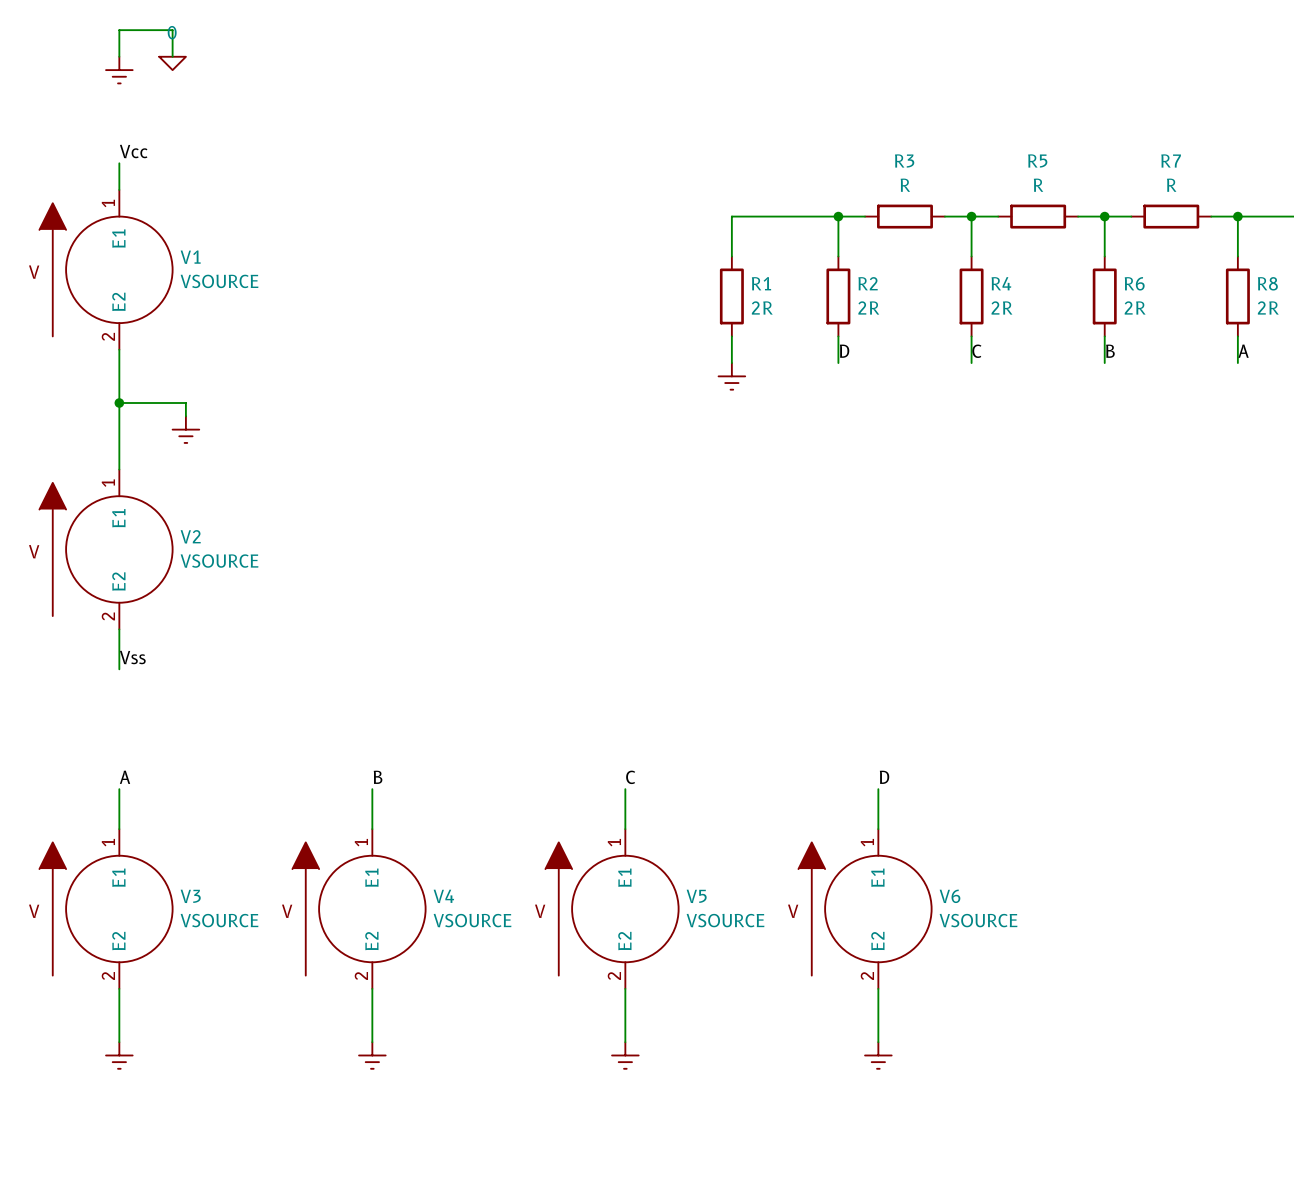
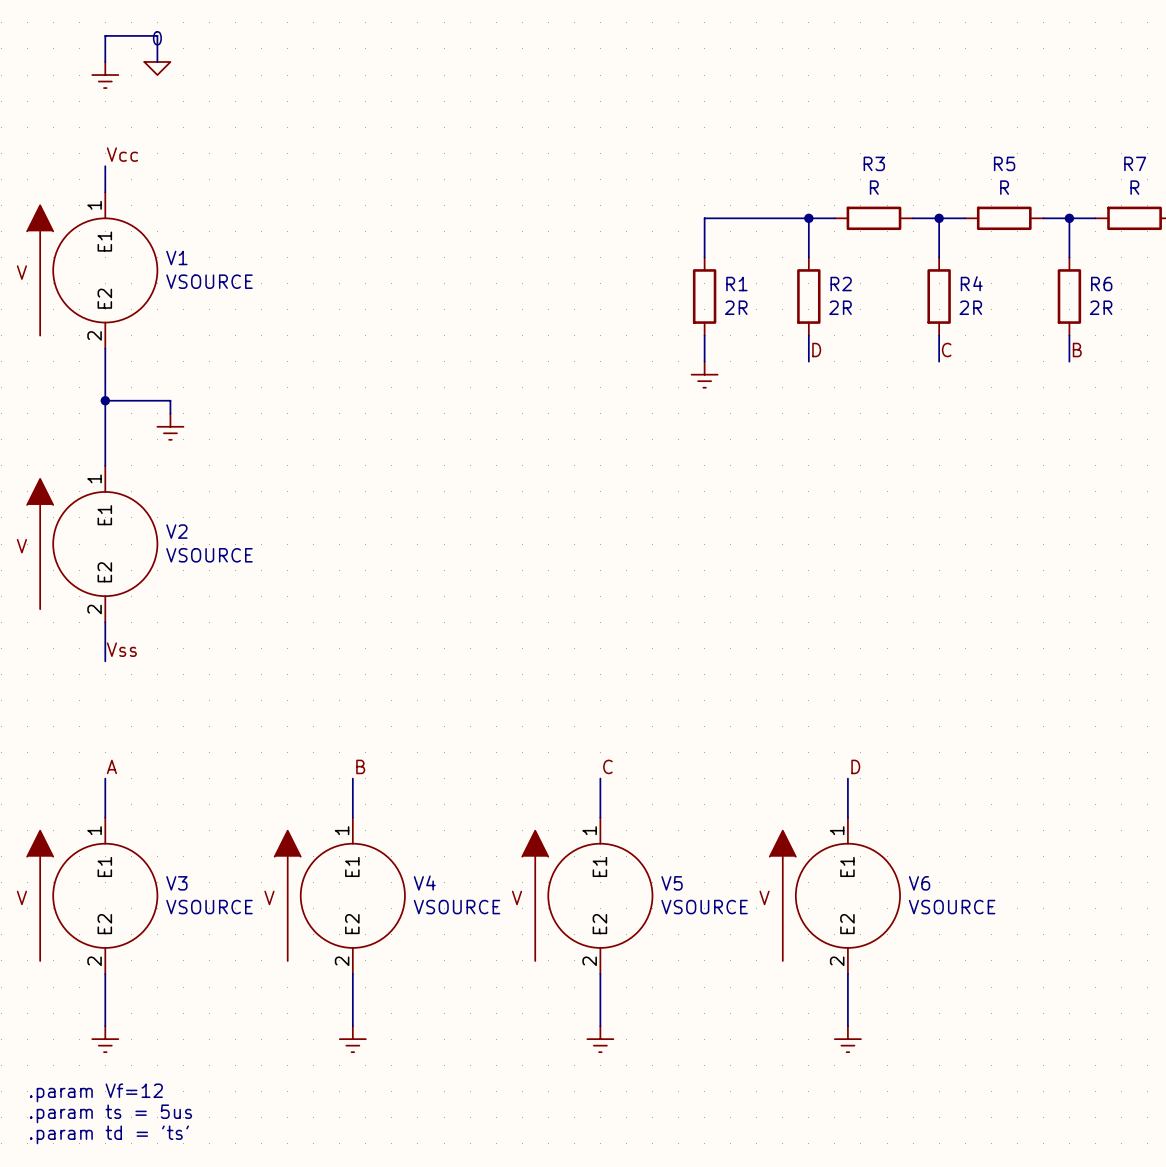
text: none -> .param Vf=12 (96, 1092)
text: none -> .param ts = 5us (110, 1113)
text: none -> .param td = 'ts' (109, 1134)

